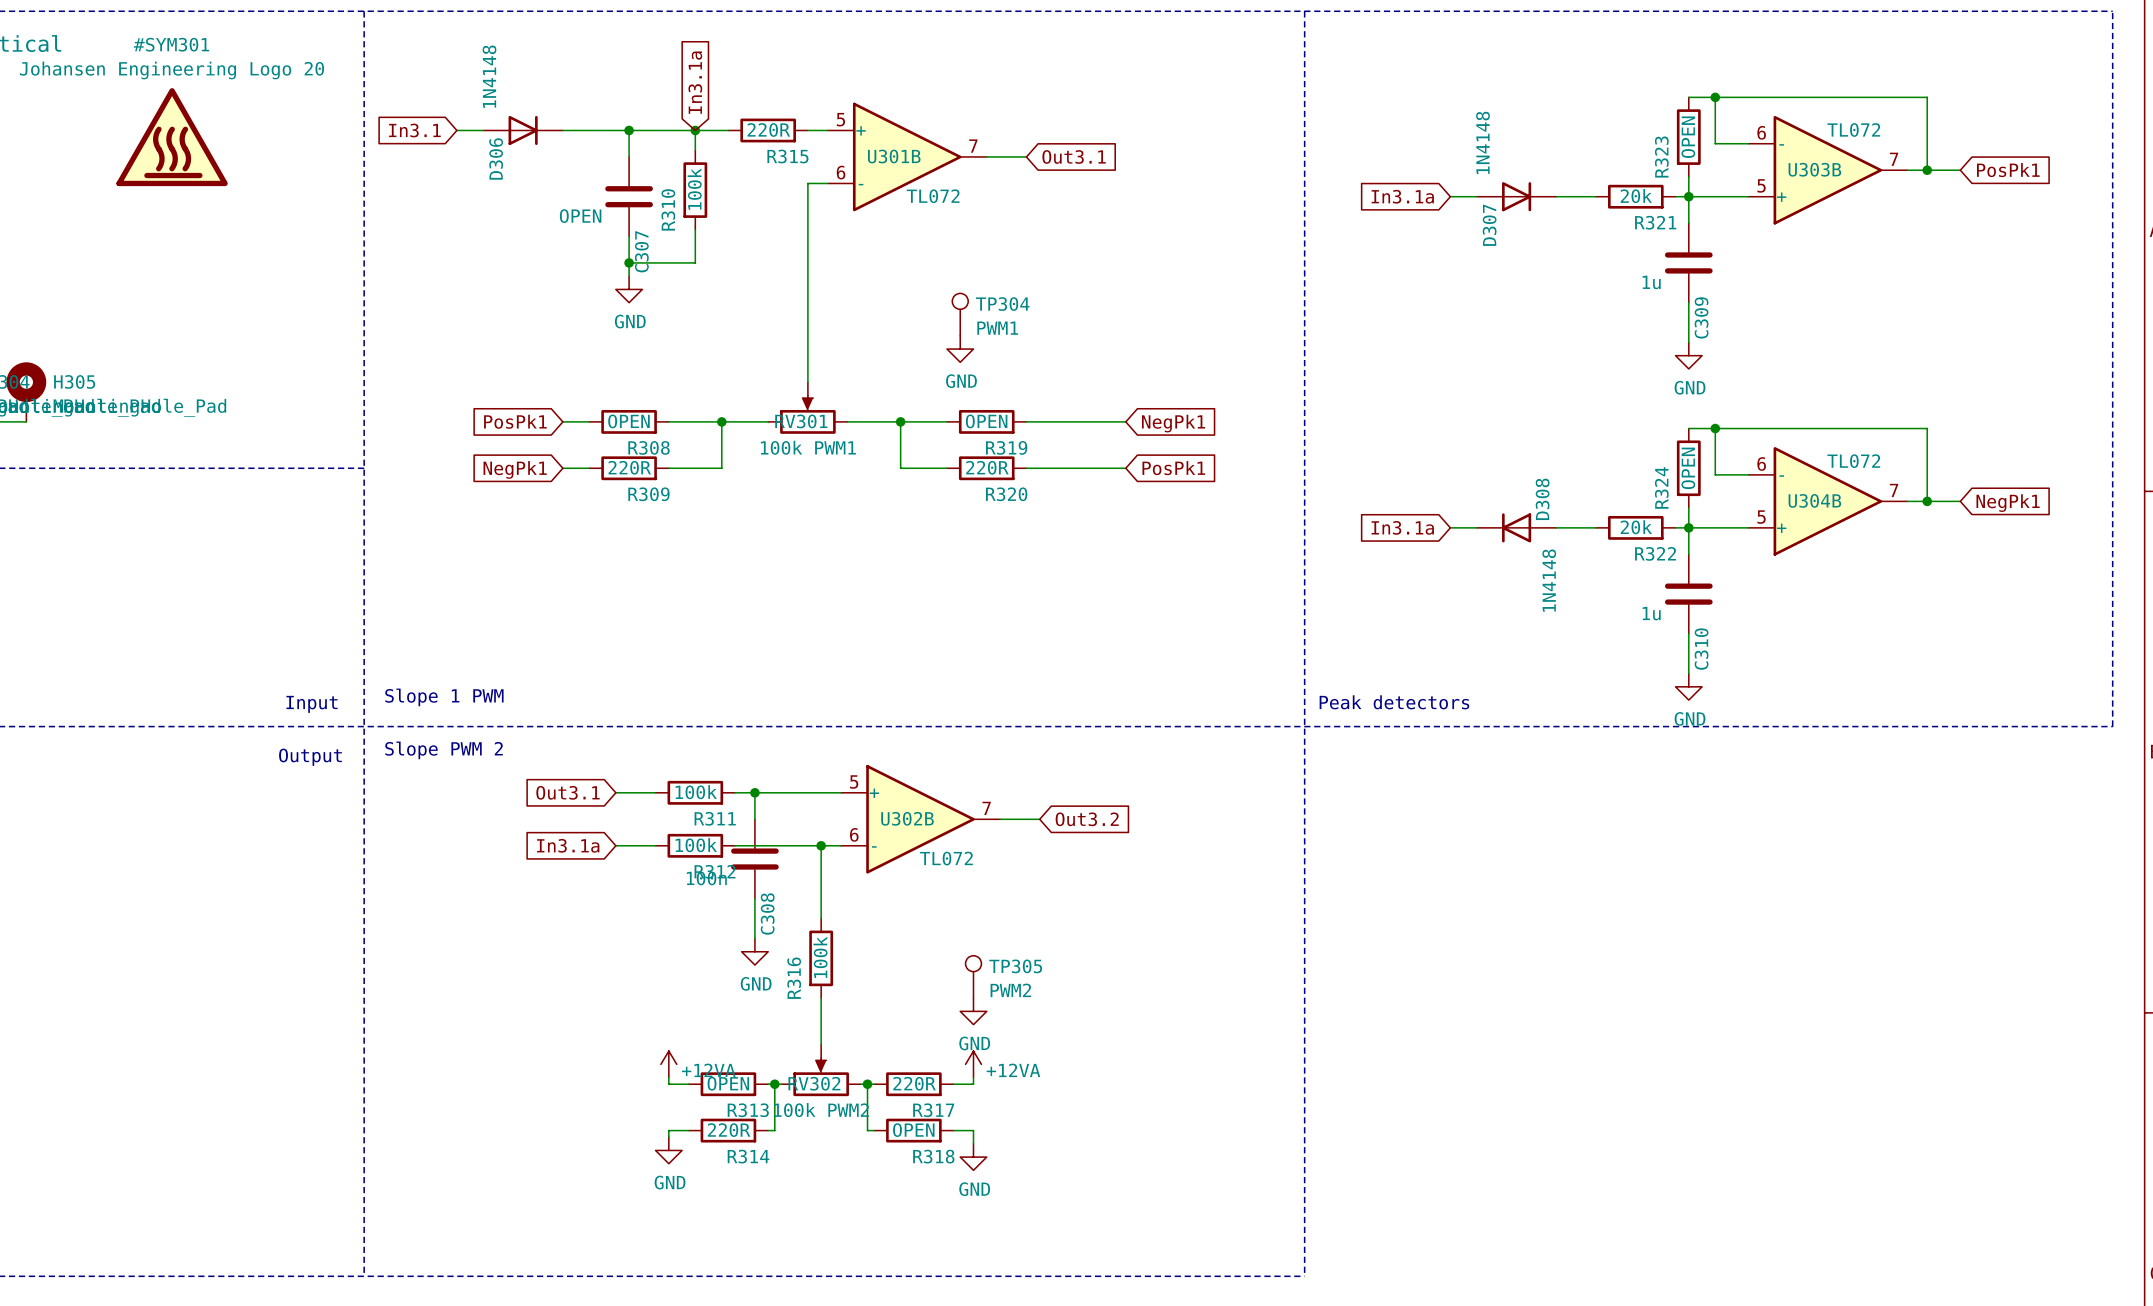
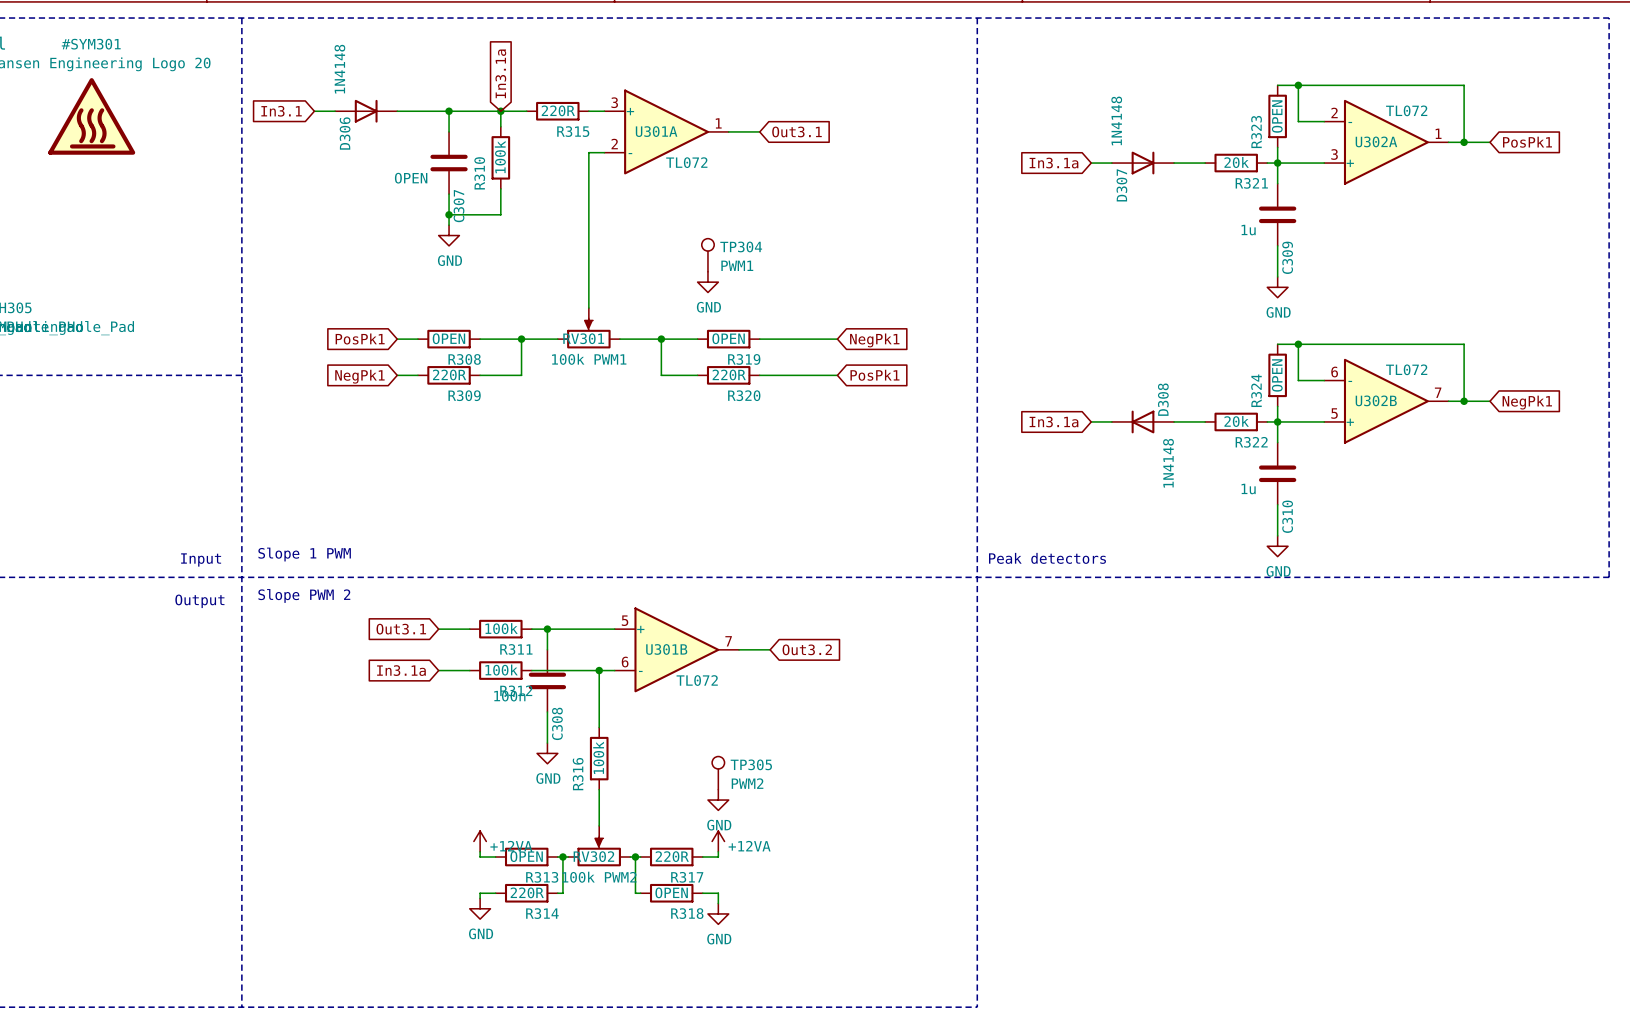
U301B pin number: 5 (840, 119) -> 3 (614, 102)
U303B pin number: 6 (1761, 132) -> 2 (1334, 112)
U301B pin number: 7 (973, 146) -> 1 (718, 123)
U301B name: U301B (894, 156) -> U301A (656, 131)
U303B pin number: 7 (1894, 159) -> 1 (1438, 133)
U303B name: U303B (1814, 169) -> U302A (1376, 141)
U301B pin number: 6 (841, 172) -> 2 (614, 144)
U303B pin number: 5 (1761, 185) -> 3 (1334, 154)
U304B name: U304B (1814, 500) -> U302B (1376, 400)
U302B name: U302B (907, 818) -> U301B (666, 649)

